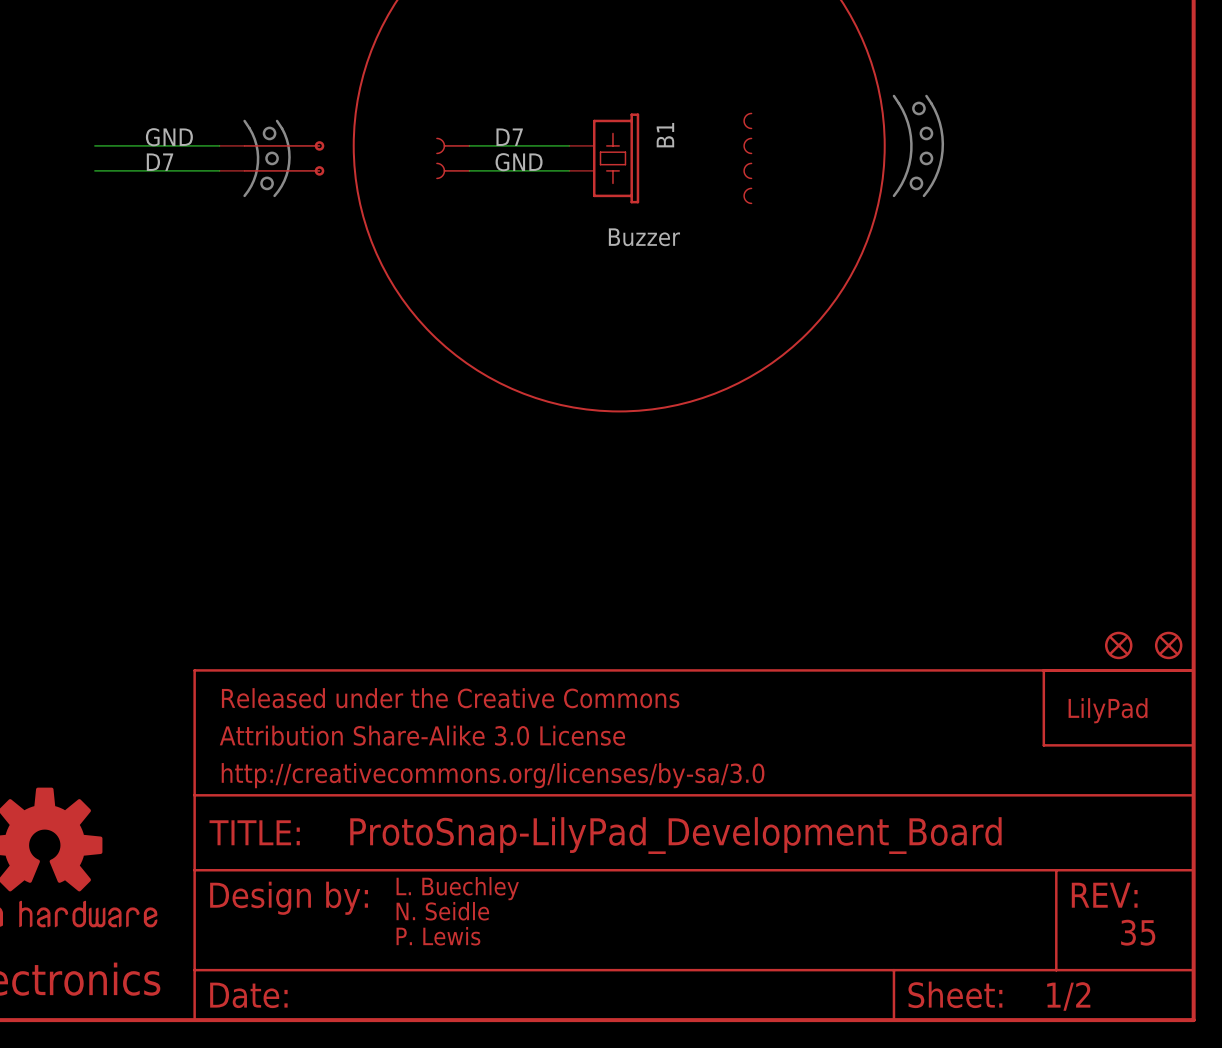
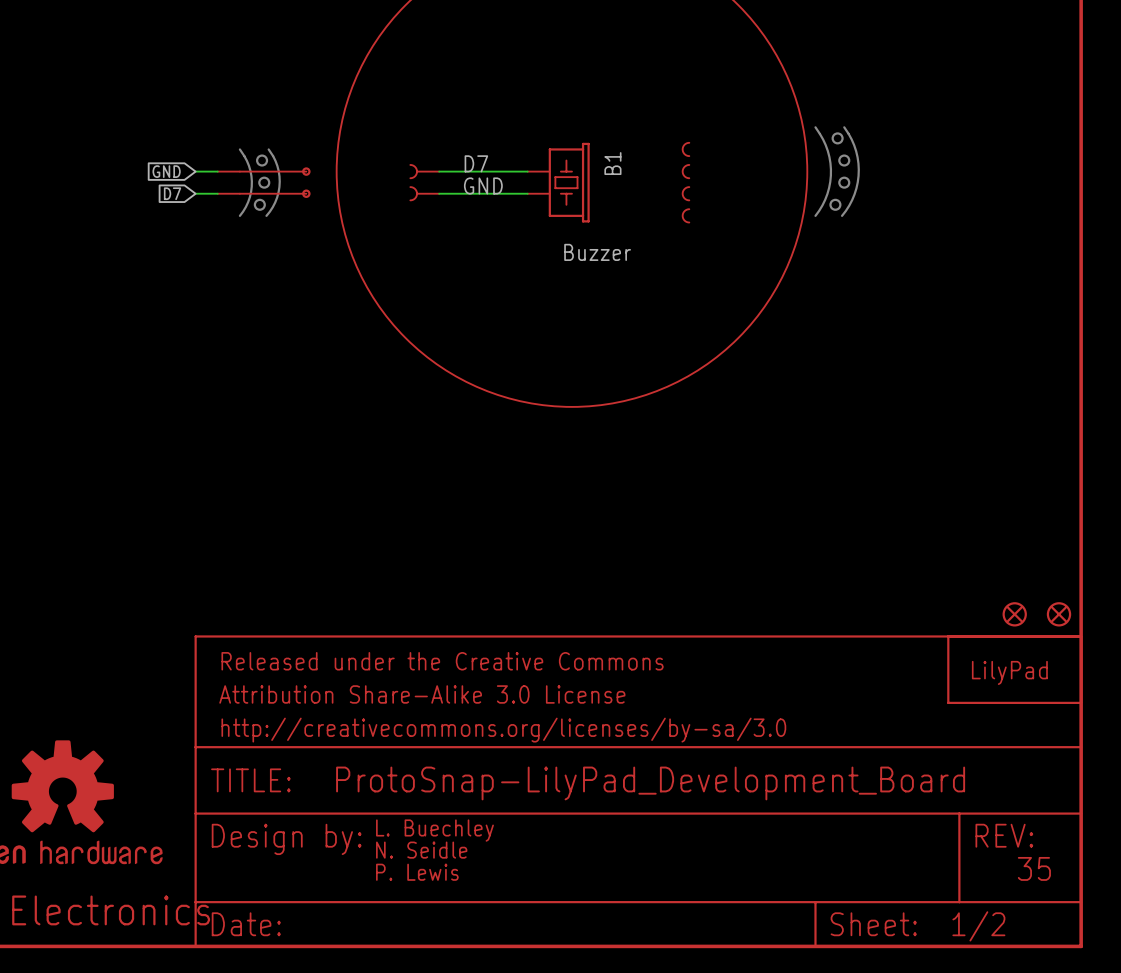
label: GND (169, 137) -> none
wire: (94, 145) (194, 145) -> none
global label: none -> GND (166, 171)
label: D7 (159, 162) -> none
wire: (94, 170) (194, 170) -> none
global label: none -> D7 (172, 193)

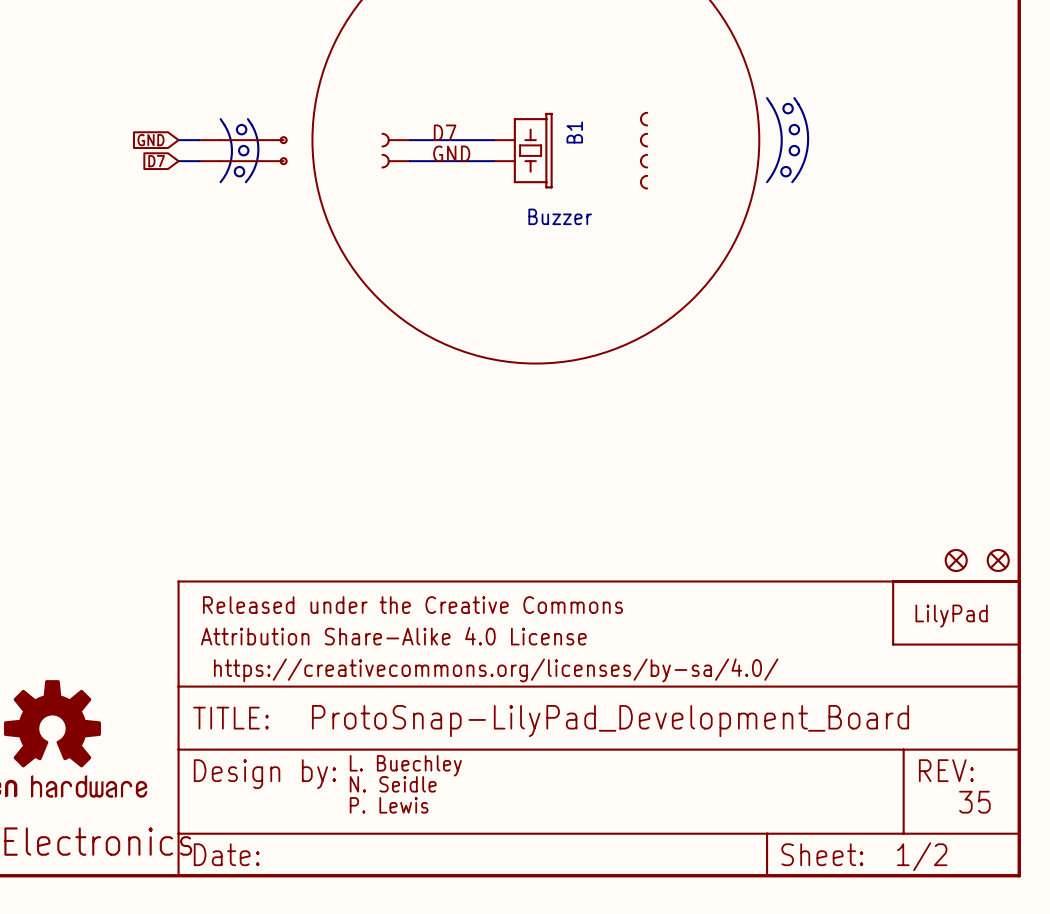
part text: Attribution Share-Alike 3.0 License (422, 694) -> Attribution Share-Alike 4.0 License (393, 636)
part text: http://creativecommons.org/licenses/by-sa/3.0 (503, 730) -> https://creativecommons.org/licenses/by-sa/4.0/ (496, 670)

